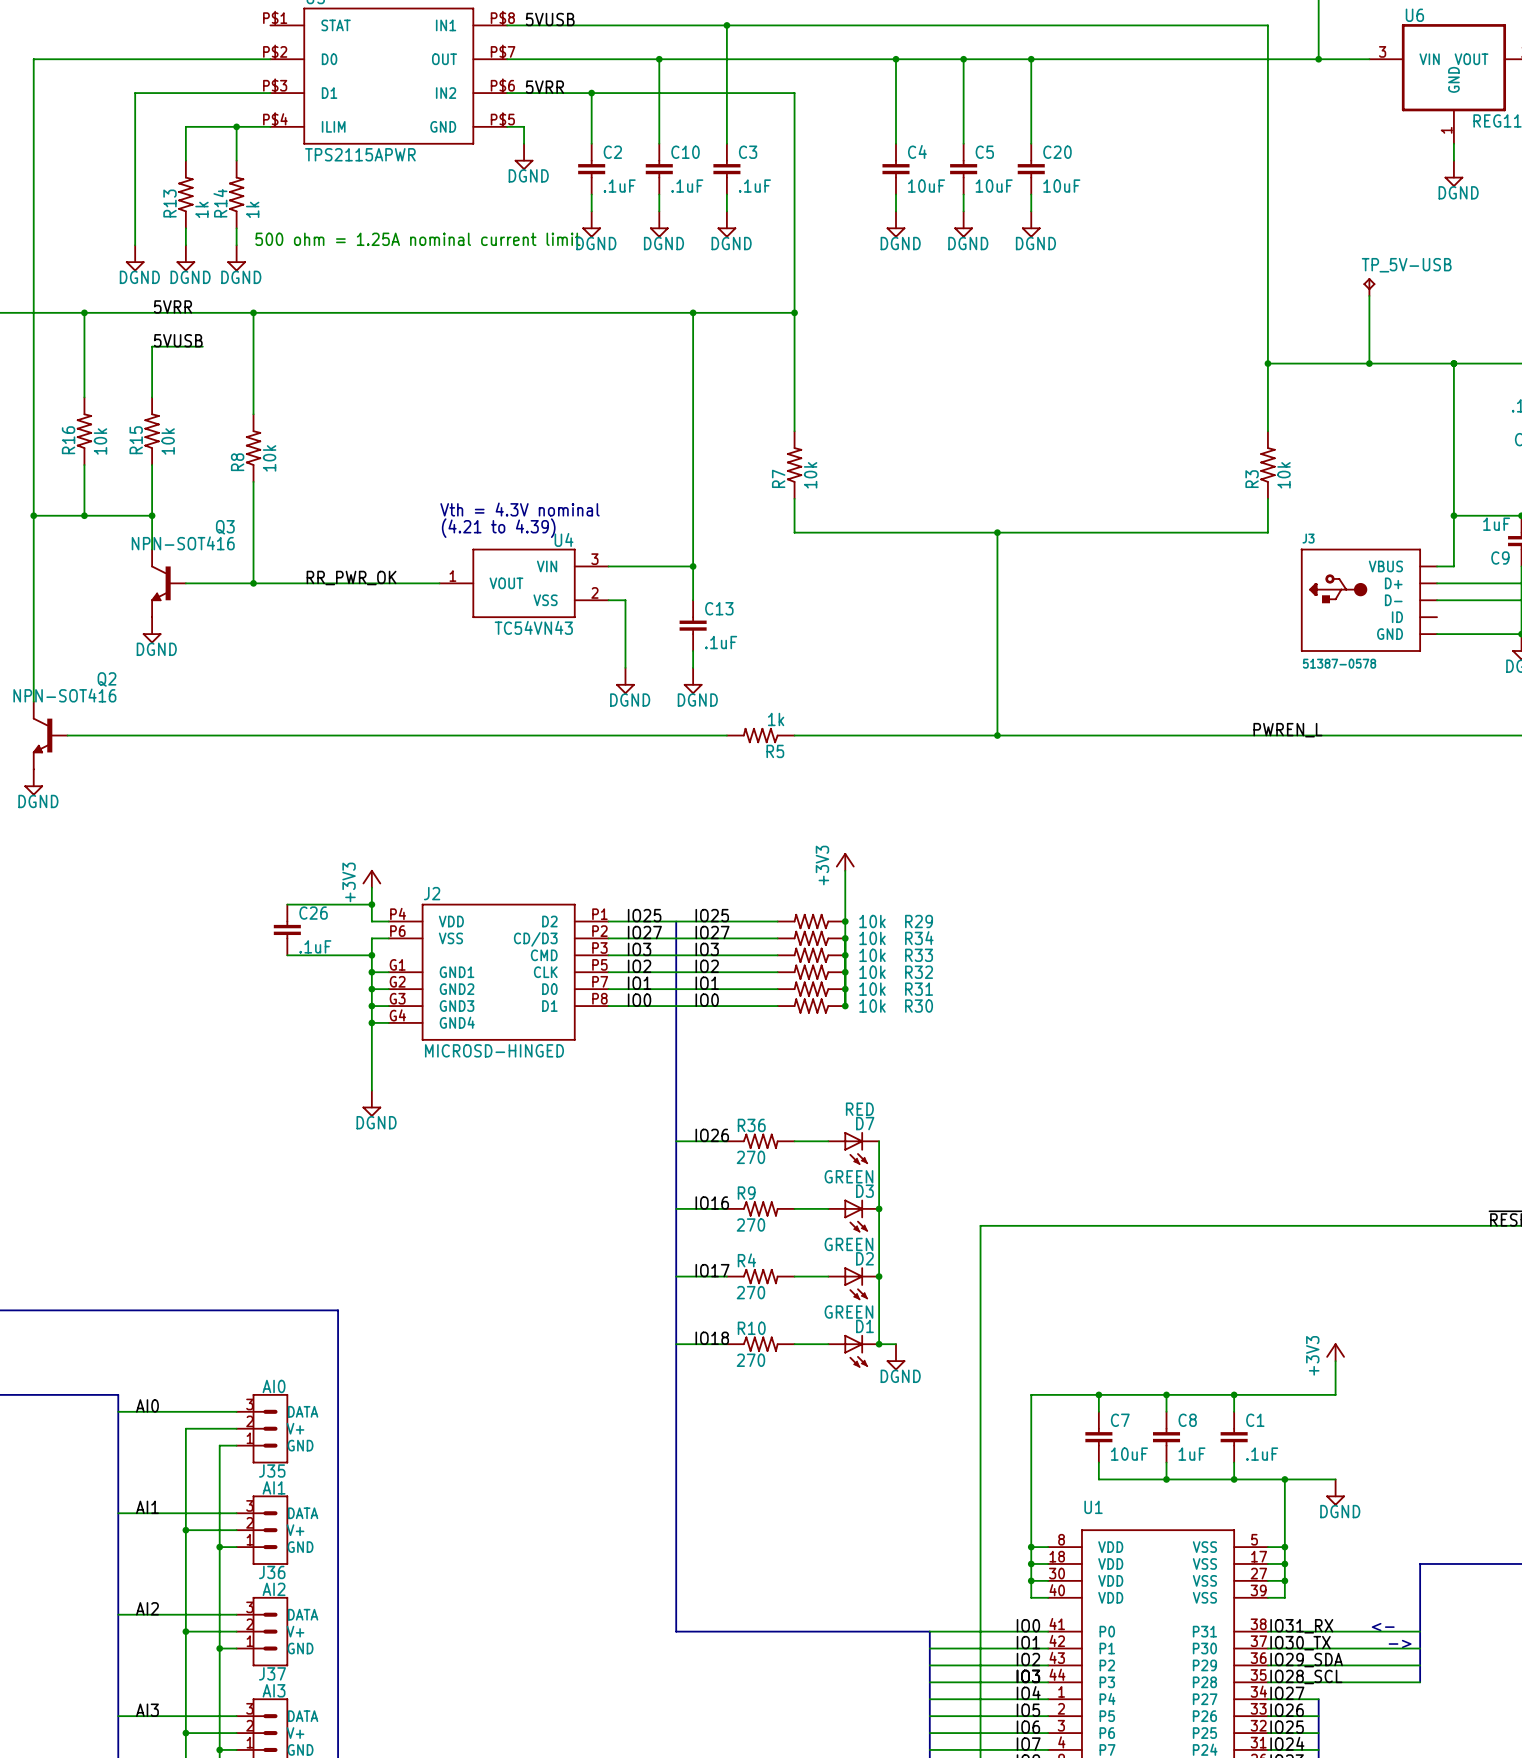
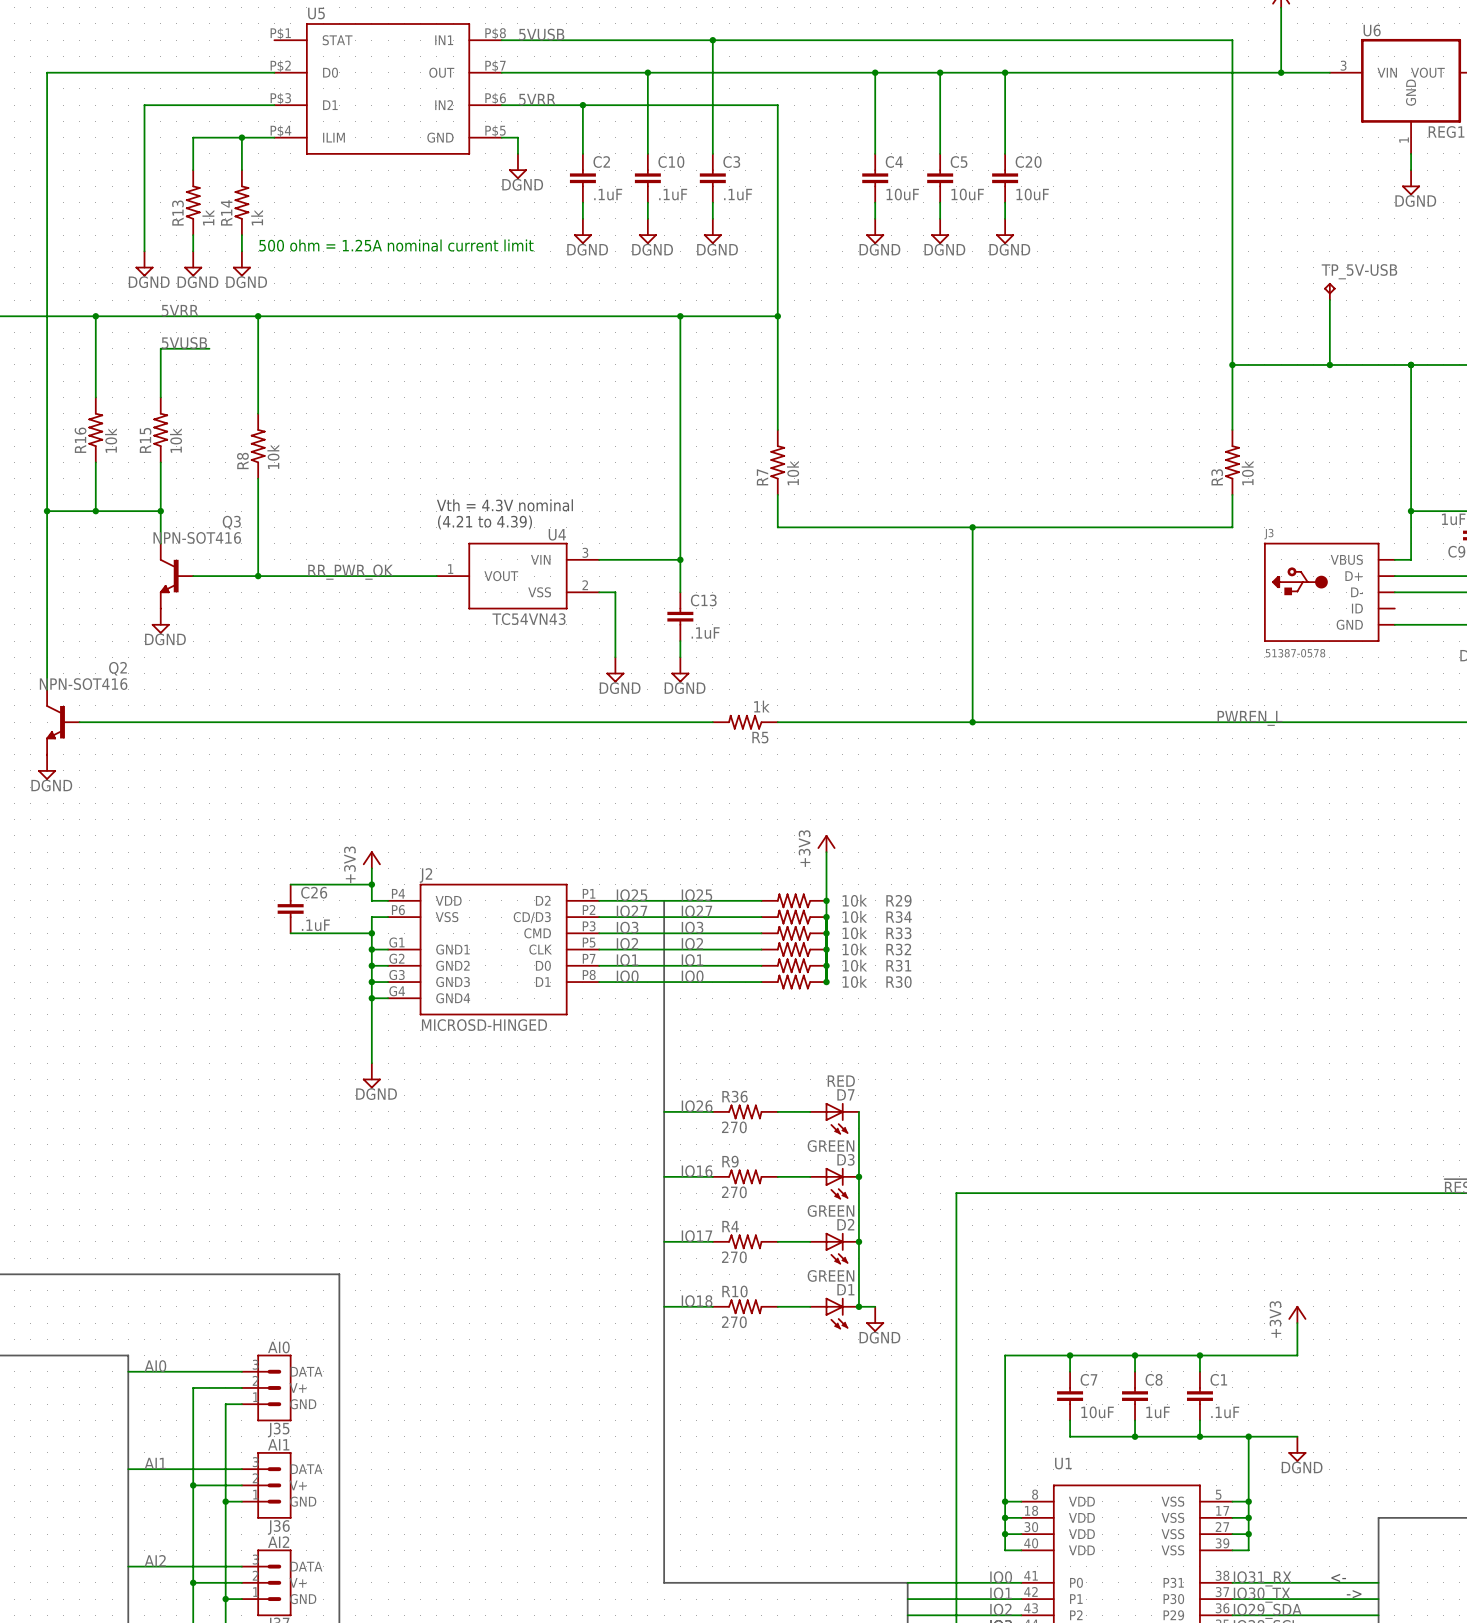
U5 value: TPS2115APWR (360, 154) -> none

